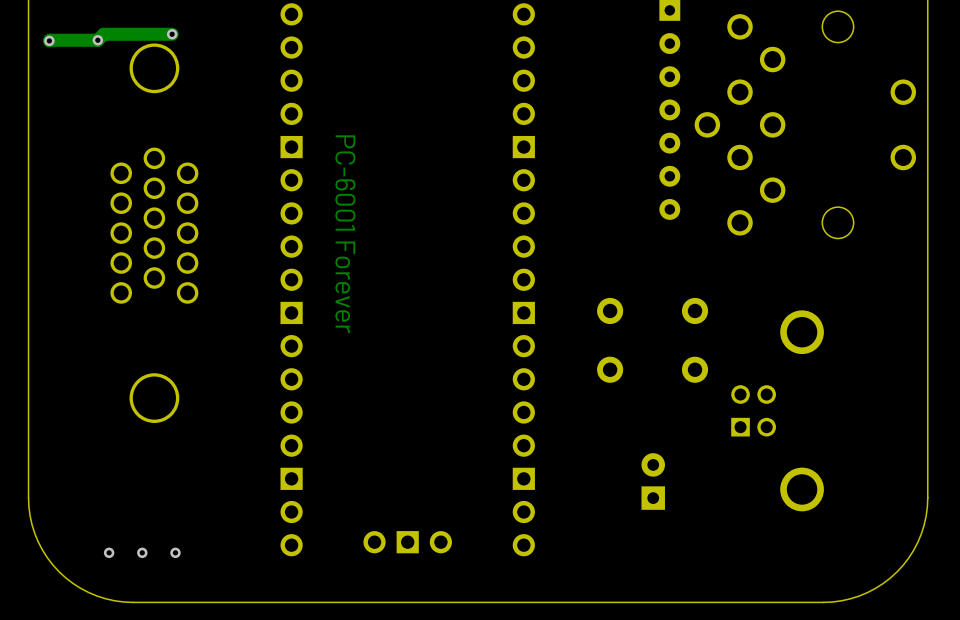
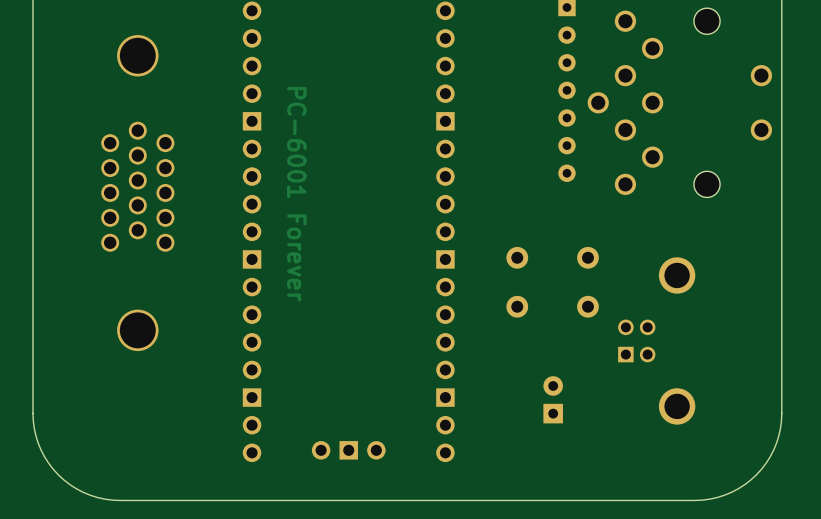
track: (172, 34) (103, 34) (97, 40) (49, 40) -> none
via: (172, 34) -> none
via: (49, 40) -> none
via: (97, 40) -> none
via: (109, 552) -> none
via: (142, 552) -> none
via: (175, 552) -> none

